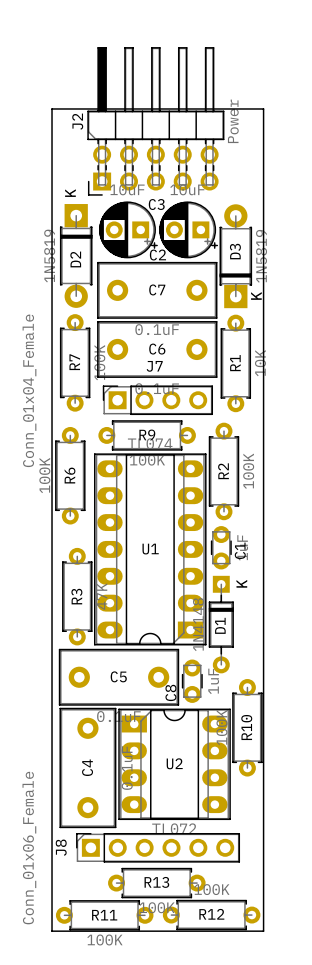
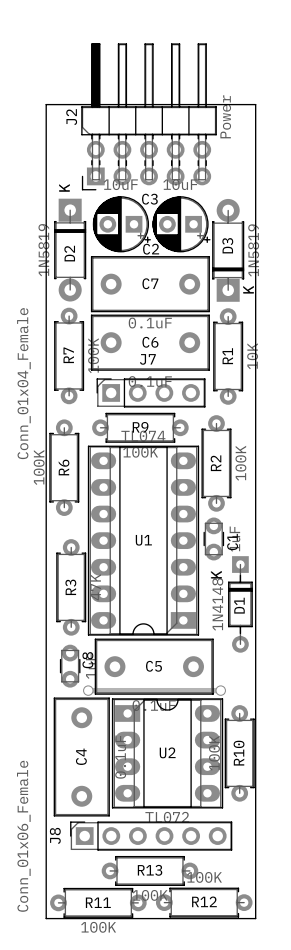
D1 footprint: [208, 575, 234, 674] -> [228, 556, 253, 653]
C5 position: (118, 677) -> (154, 666)
C8 position: (192, 681) -> (70, 666)
C8 name position: C8 (170, 692) -> C8 (87, 660)
track: none -> (88, 690) (220, 690)
via: none -> (88, 690)
via: none -> (220, 690)
R10 position: (247, 727) -> (239, 753)

